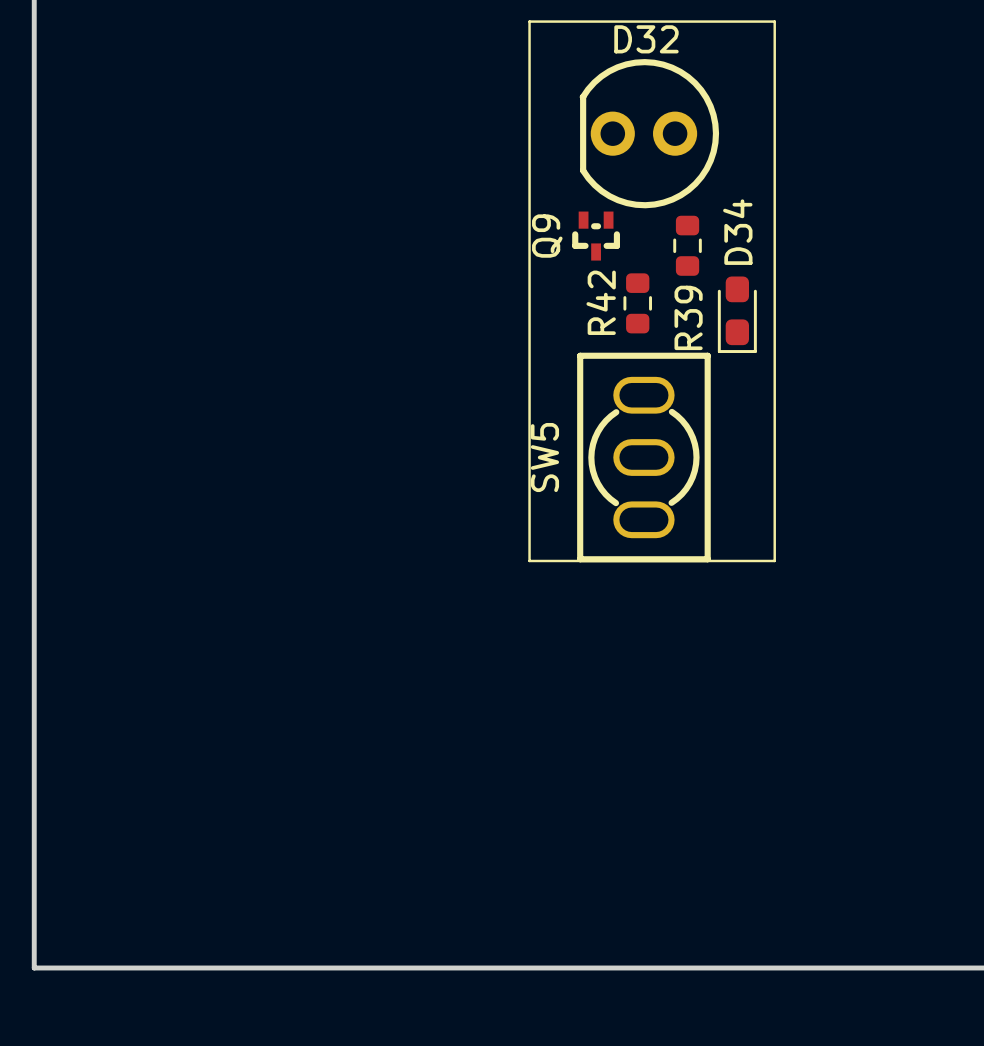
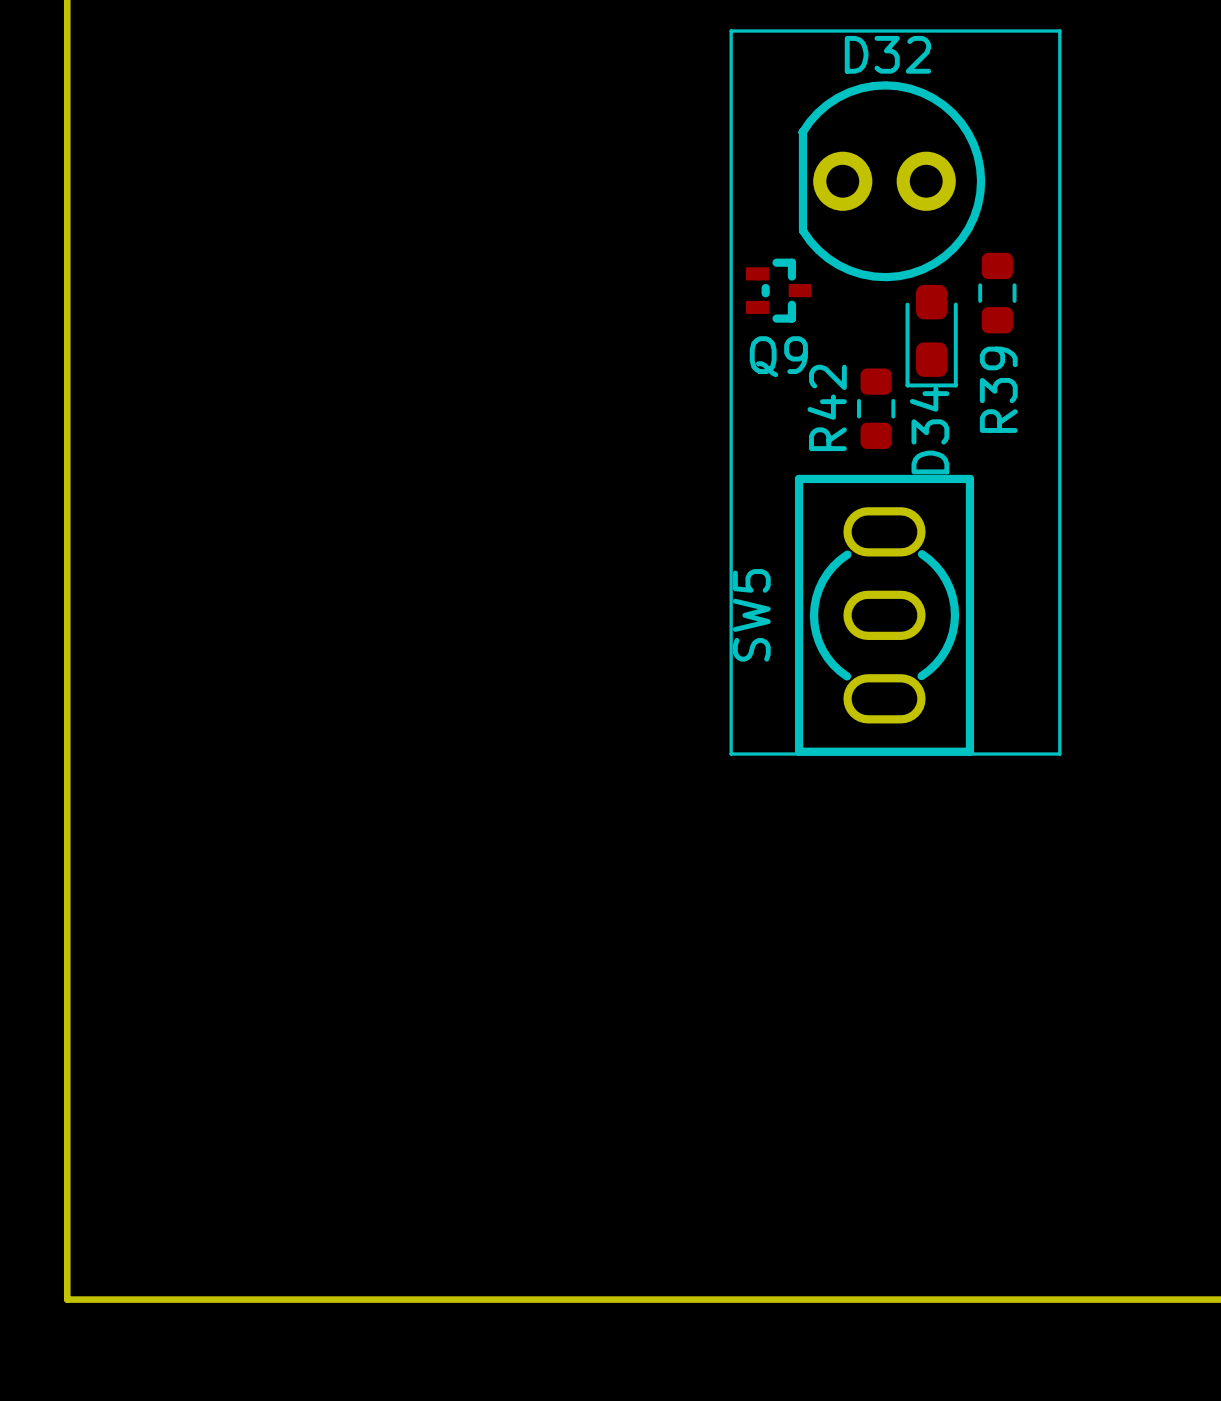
D34 name position: D34 (737, 232) -> D34 (929, 430)
Q9 rotation: 0° (596, 236) -> 90° counterclockwise (778, 290)
Q9 position: (596, 236) -> (778, 290)
R39 position: (687, 245) -> (997, 293)
D34 position: (737, 314) -> (931, 336)

